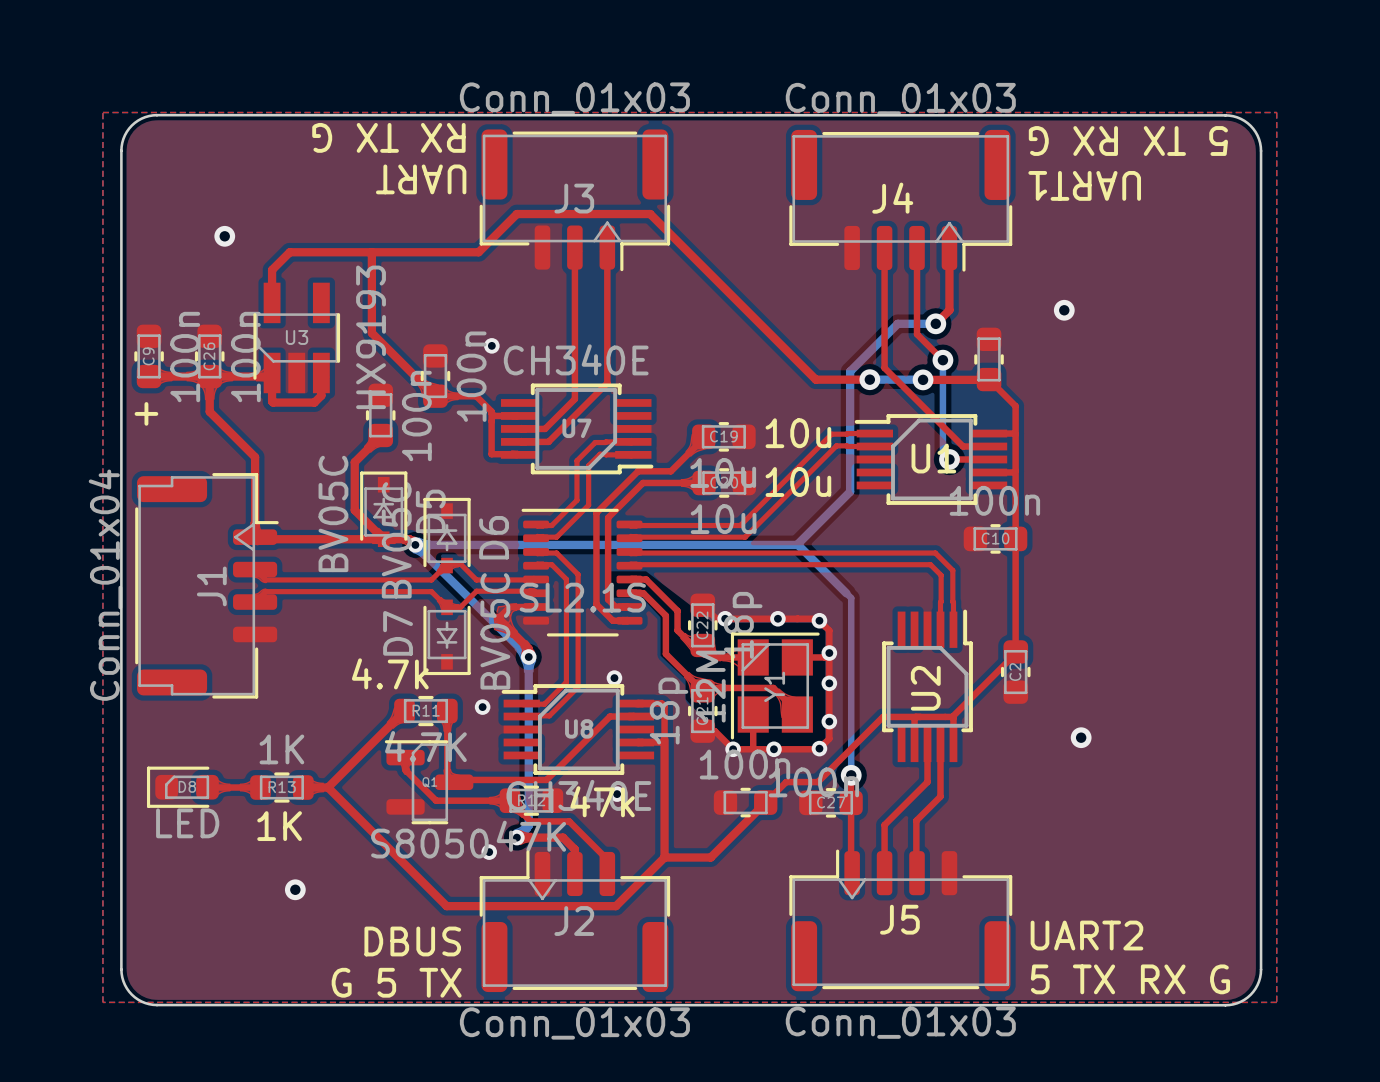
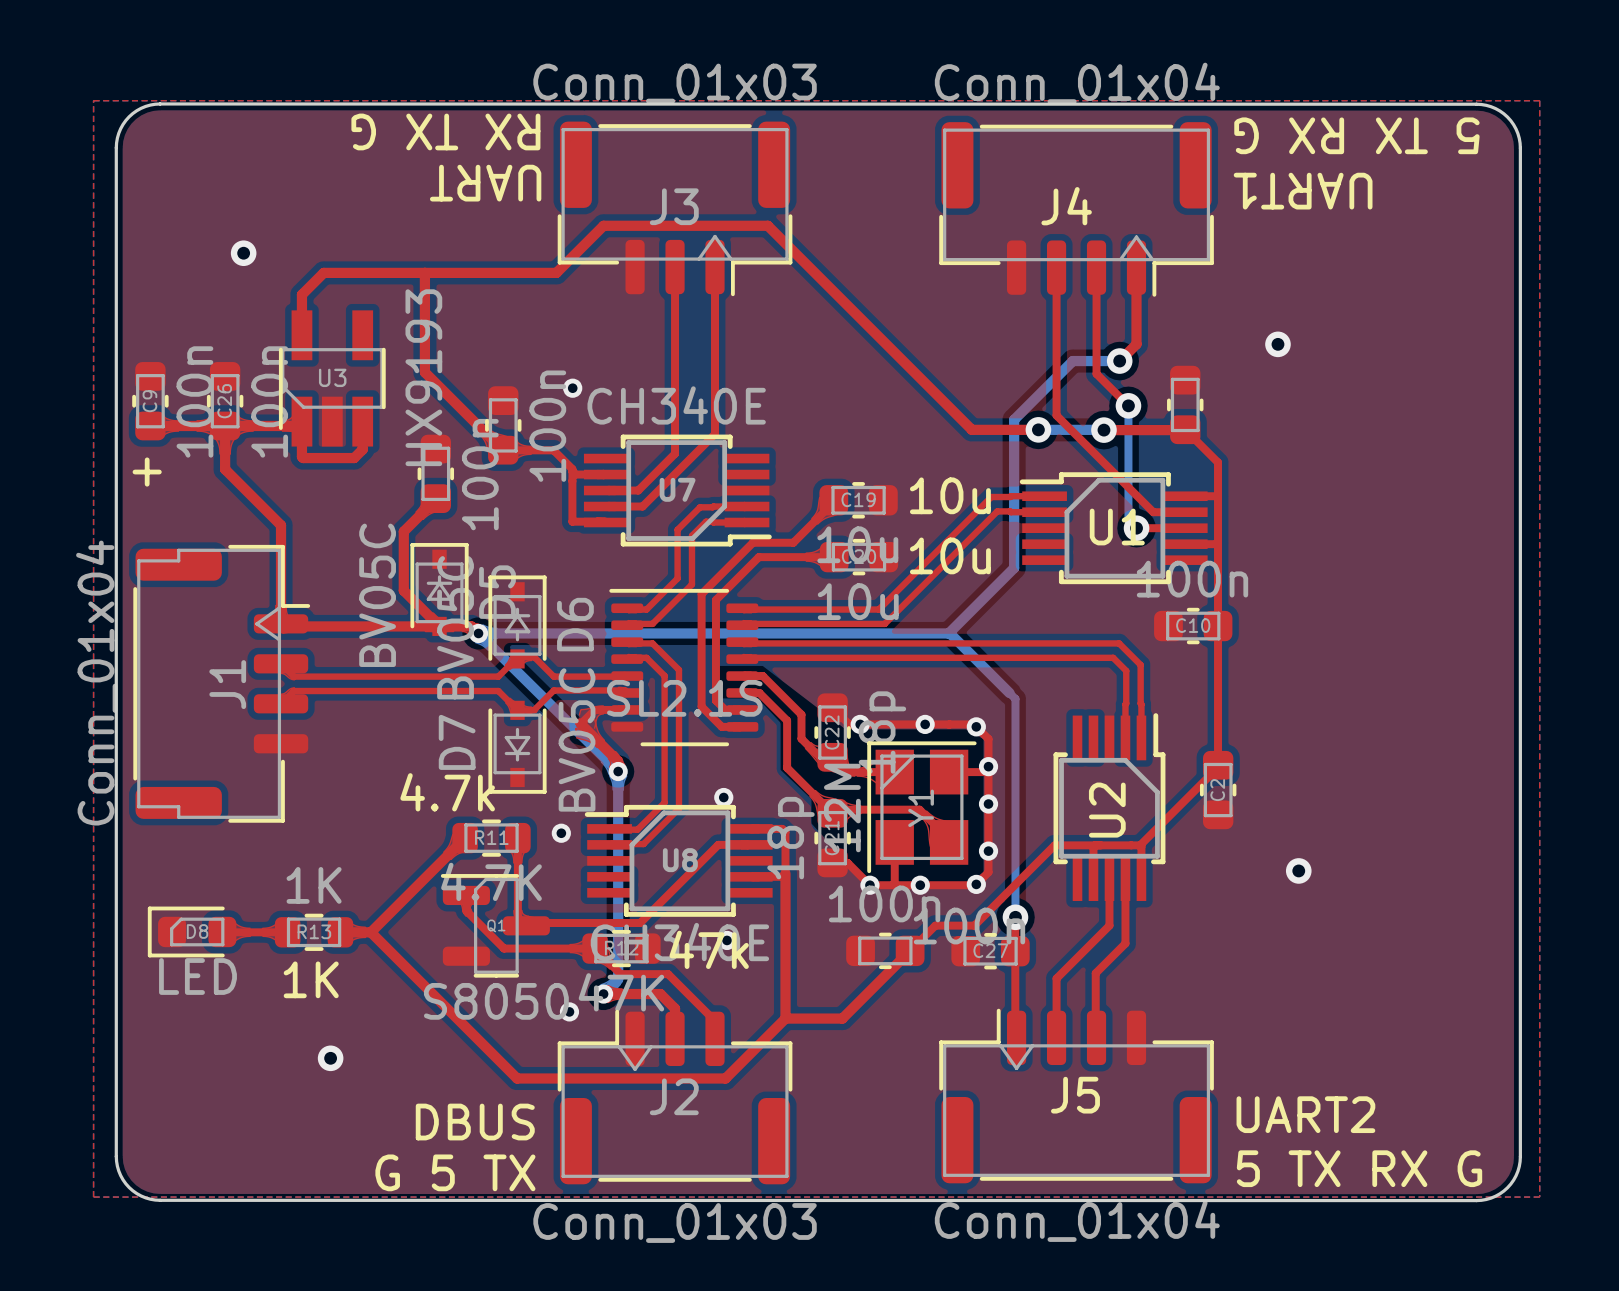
J4 value: Conn_01x03 (900, 99) -> Conn_01x04 (1077, 83)
J5 value: Conn_01x03 (900, 1022) -> Conn_01x04 (1077, 1221)

